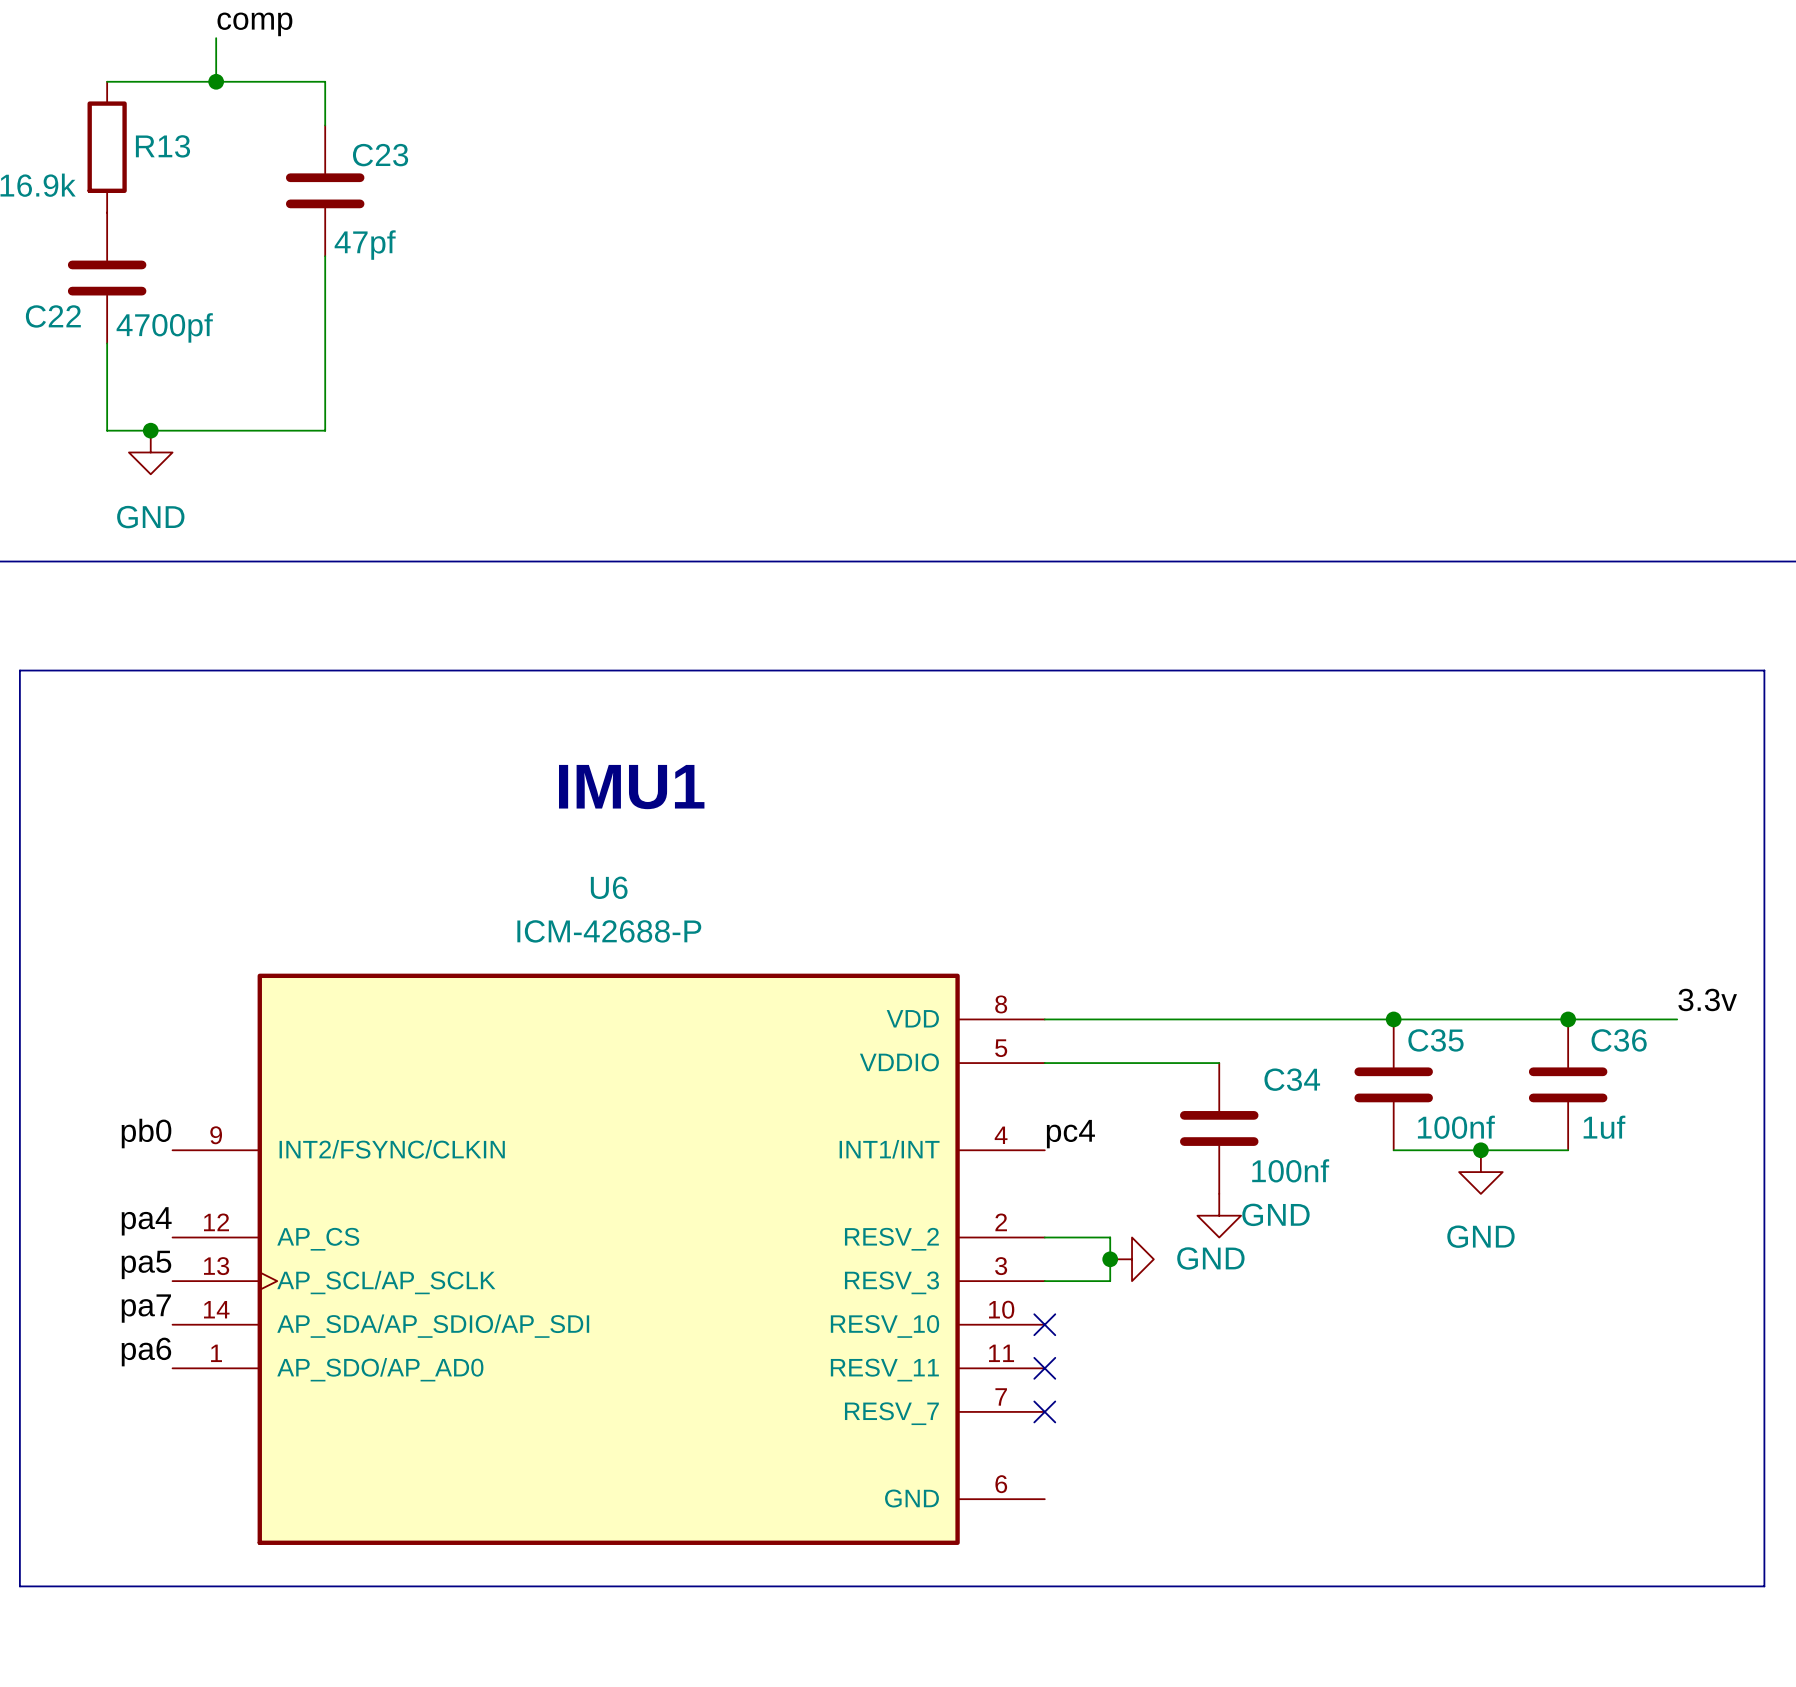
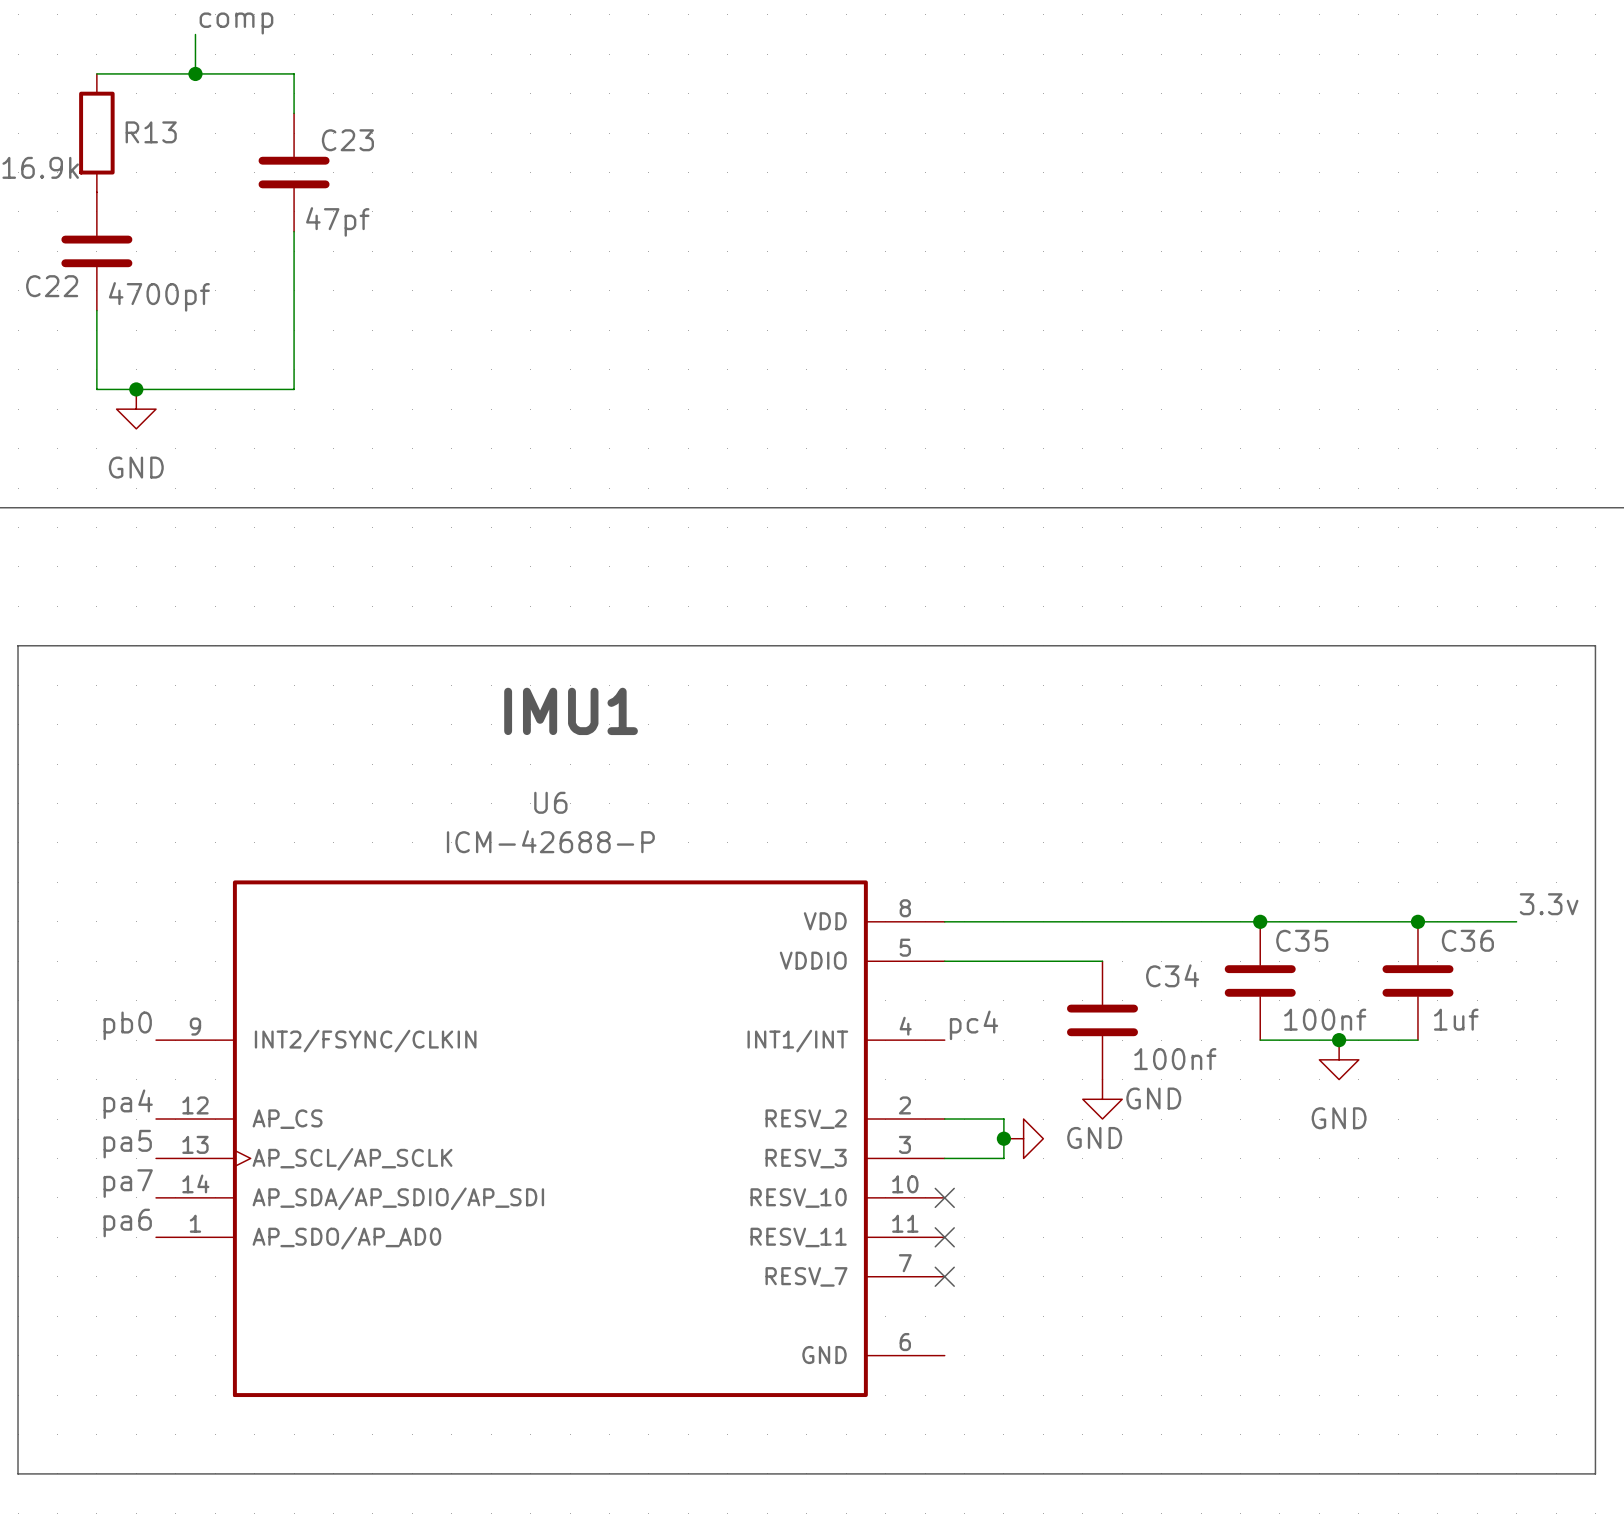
line: (19, 714) (19, 670) (1764, 670) (1764, 714) -> (18, 645) (1595, 645)
line: (19, 1586) (1764, 1586) -> (18, 1434) (18, 1473) (1595, 1473) (1595, 1434)

